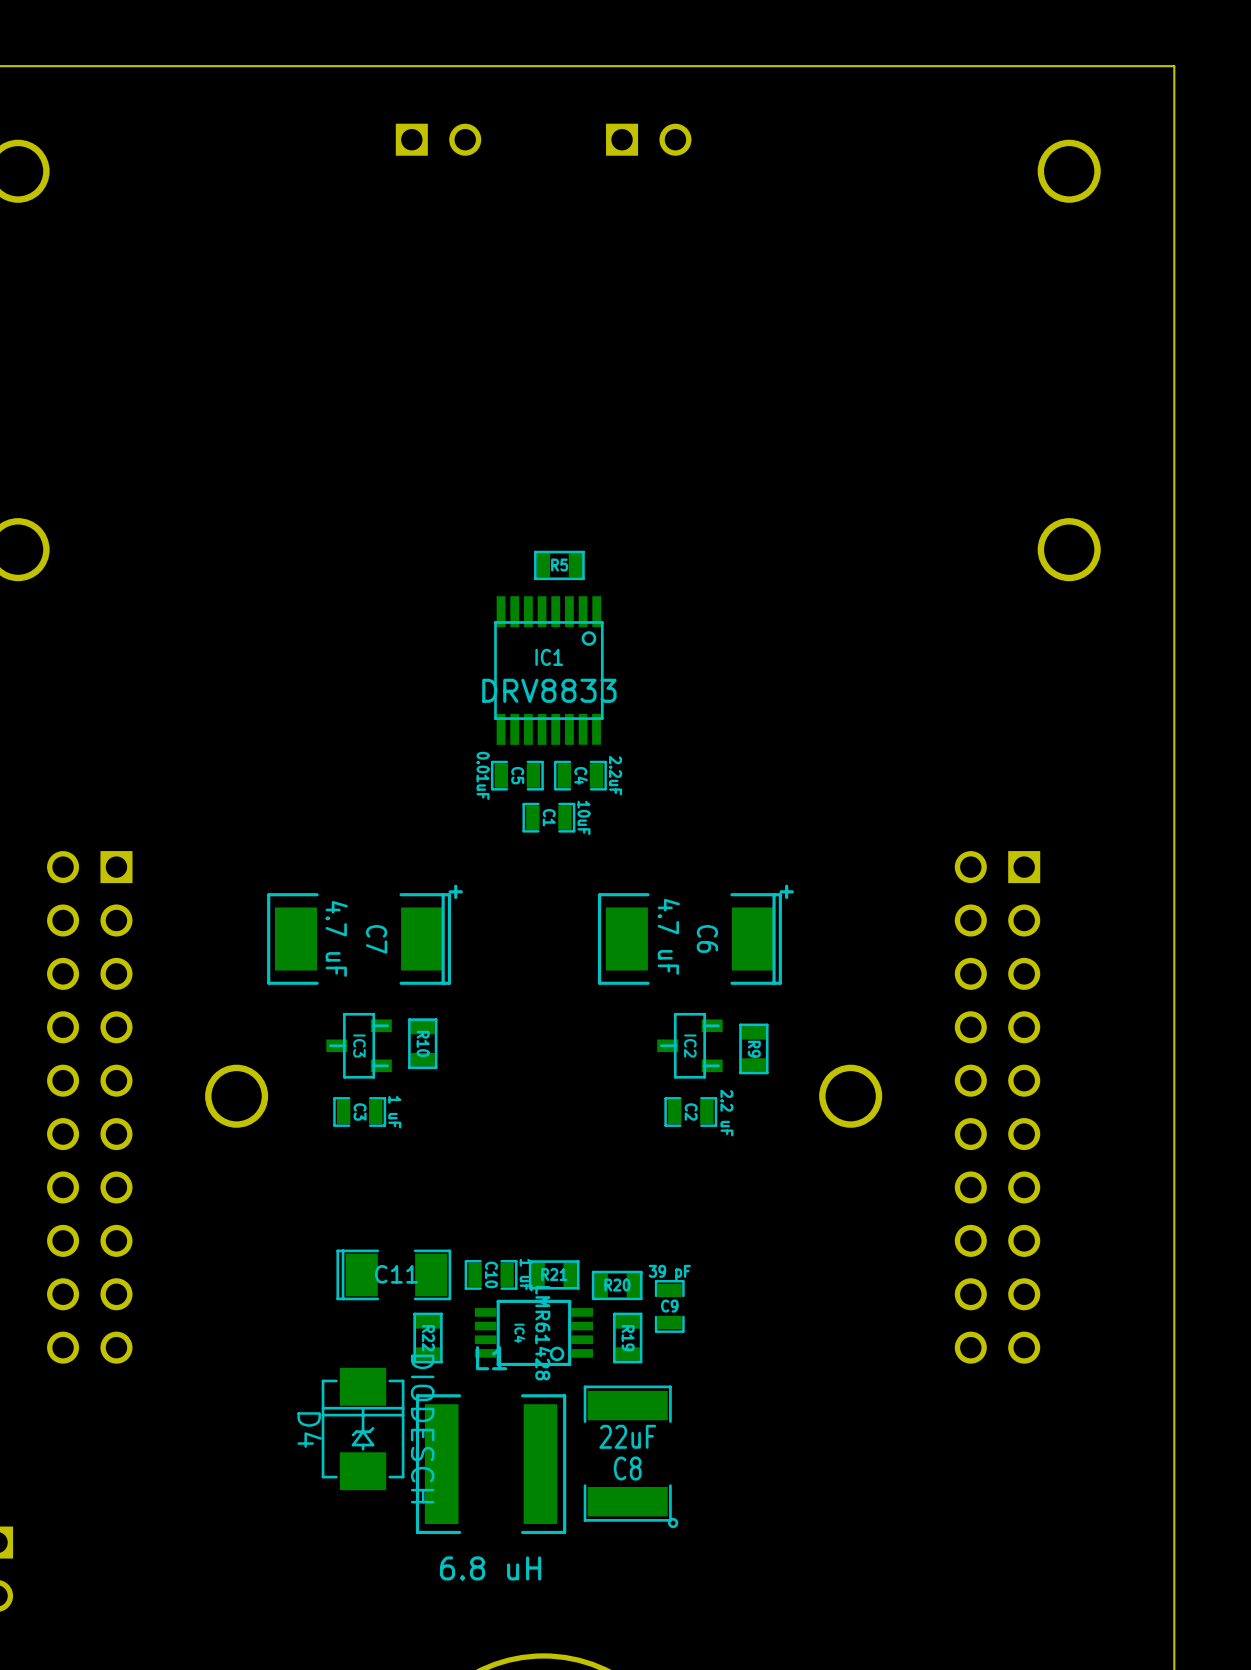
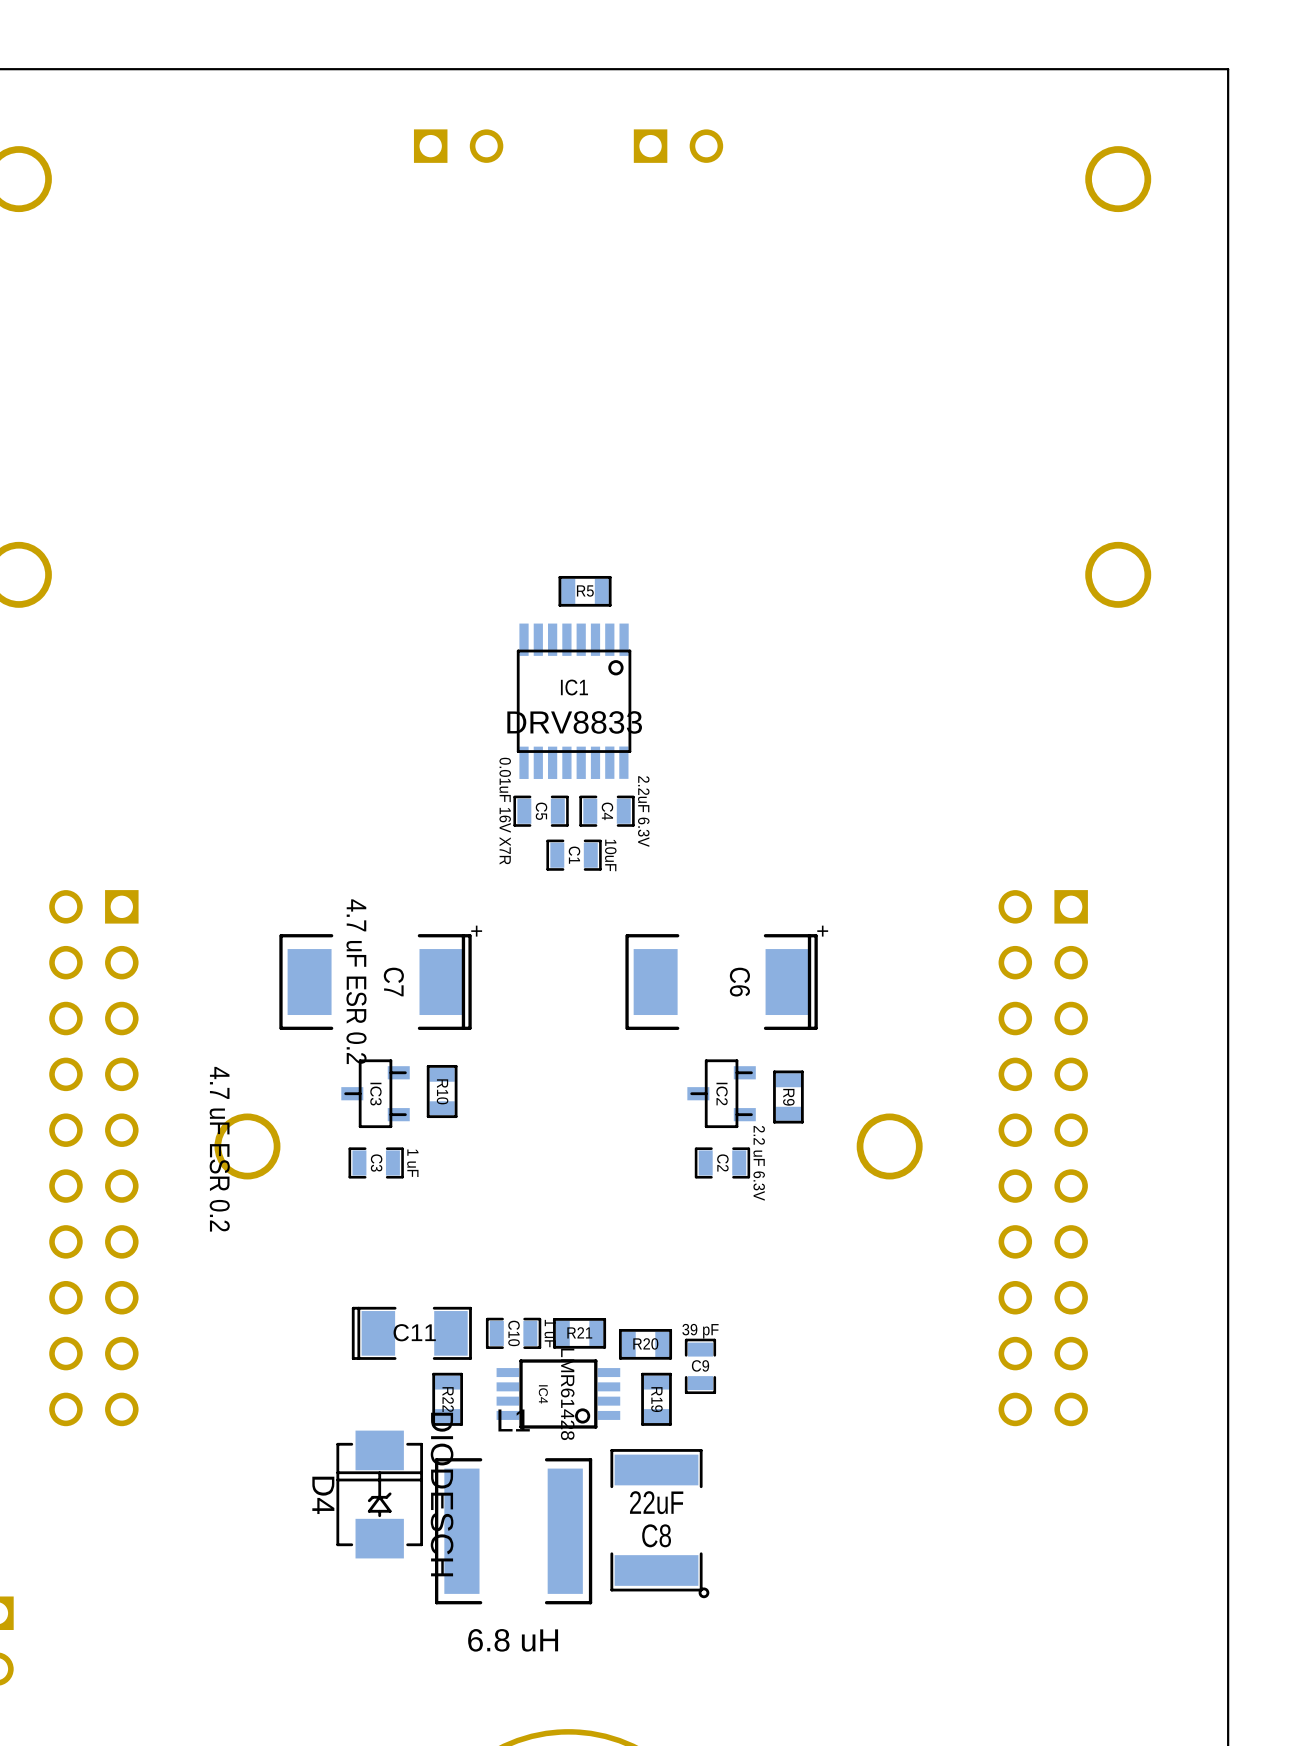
C5 value: 0.01uF (483, 775) -> 0.01uF 16V X7R (505, 811)
C4 value: 2.2uF (615, 775) -> 2.2uF 6.3V (643, 811)
C6 value: 4.7 uF (668, 936) -> 4.7 uF ESR 0.2 (219, 1149)
C7 value: 4.7 uF (336, 938) -> 4.7 uF ESR 0.2 (356, 981)
C2 value: 2.2 uF (726, 1113) -> 2.2 uF 6.3V (759, 1163)

